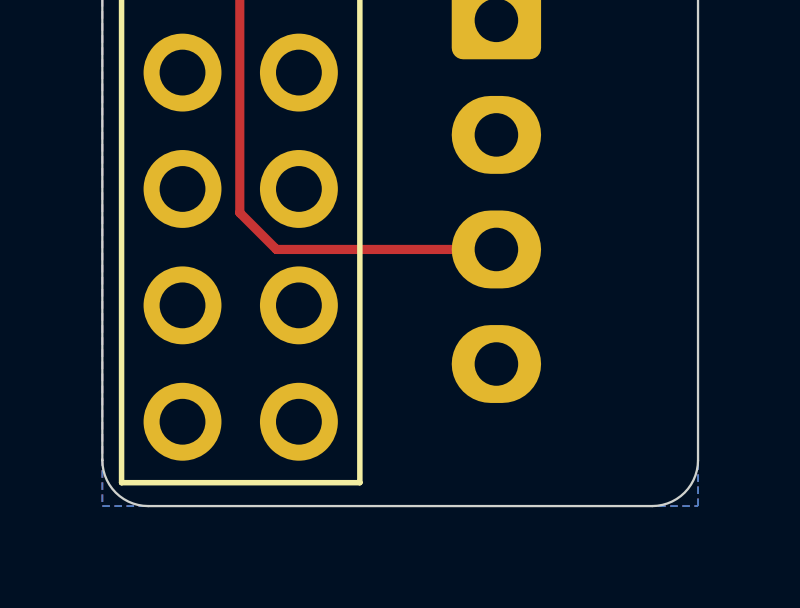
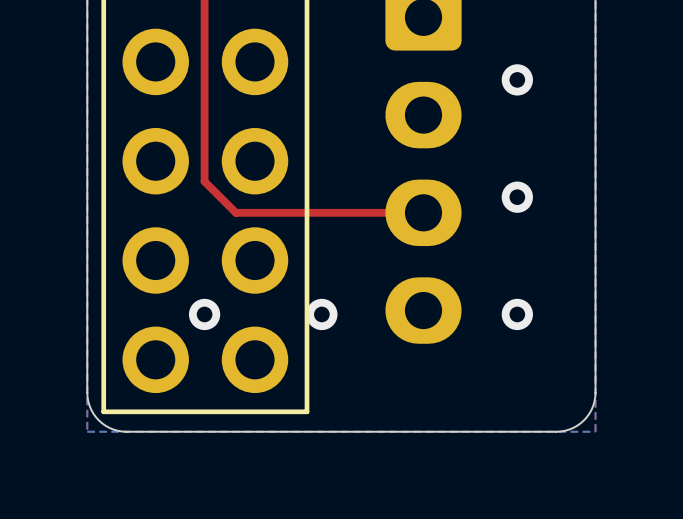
via: none -> (517, 79)
via: none -> (517, 197)
via: none -> (204, 314)
via: none -> (321, 314)
via: none -> (517, 314)

